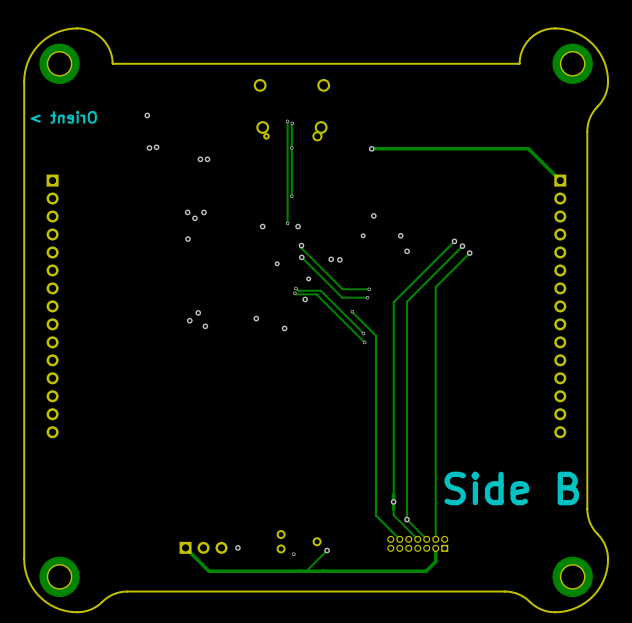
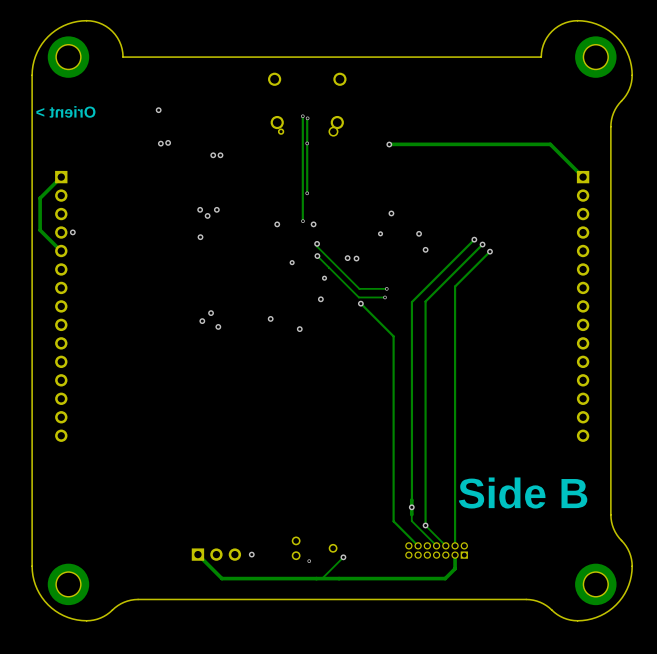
track: none -> (61, 177) (40, 198) (40, 230) (60, 250)
via: none -> (72, 232)
track: (295, 288) (298, 290) (320, 290) (363, 333) -> none
via: (295, 288) -> none
track: (294, 293) (316, 294) (364, 342) -> none
via: (294, 293) -> none
track: none -> (360, 303) (369, 312)
via: none -> (360, 303)
via: (352, 311) -> none
via: (363, 333) -> none
via: (364, 342) -> none

